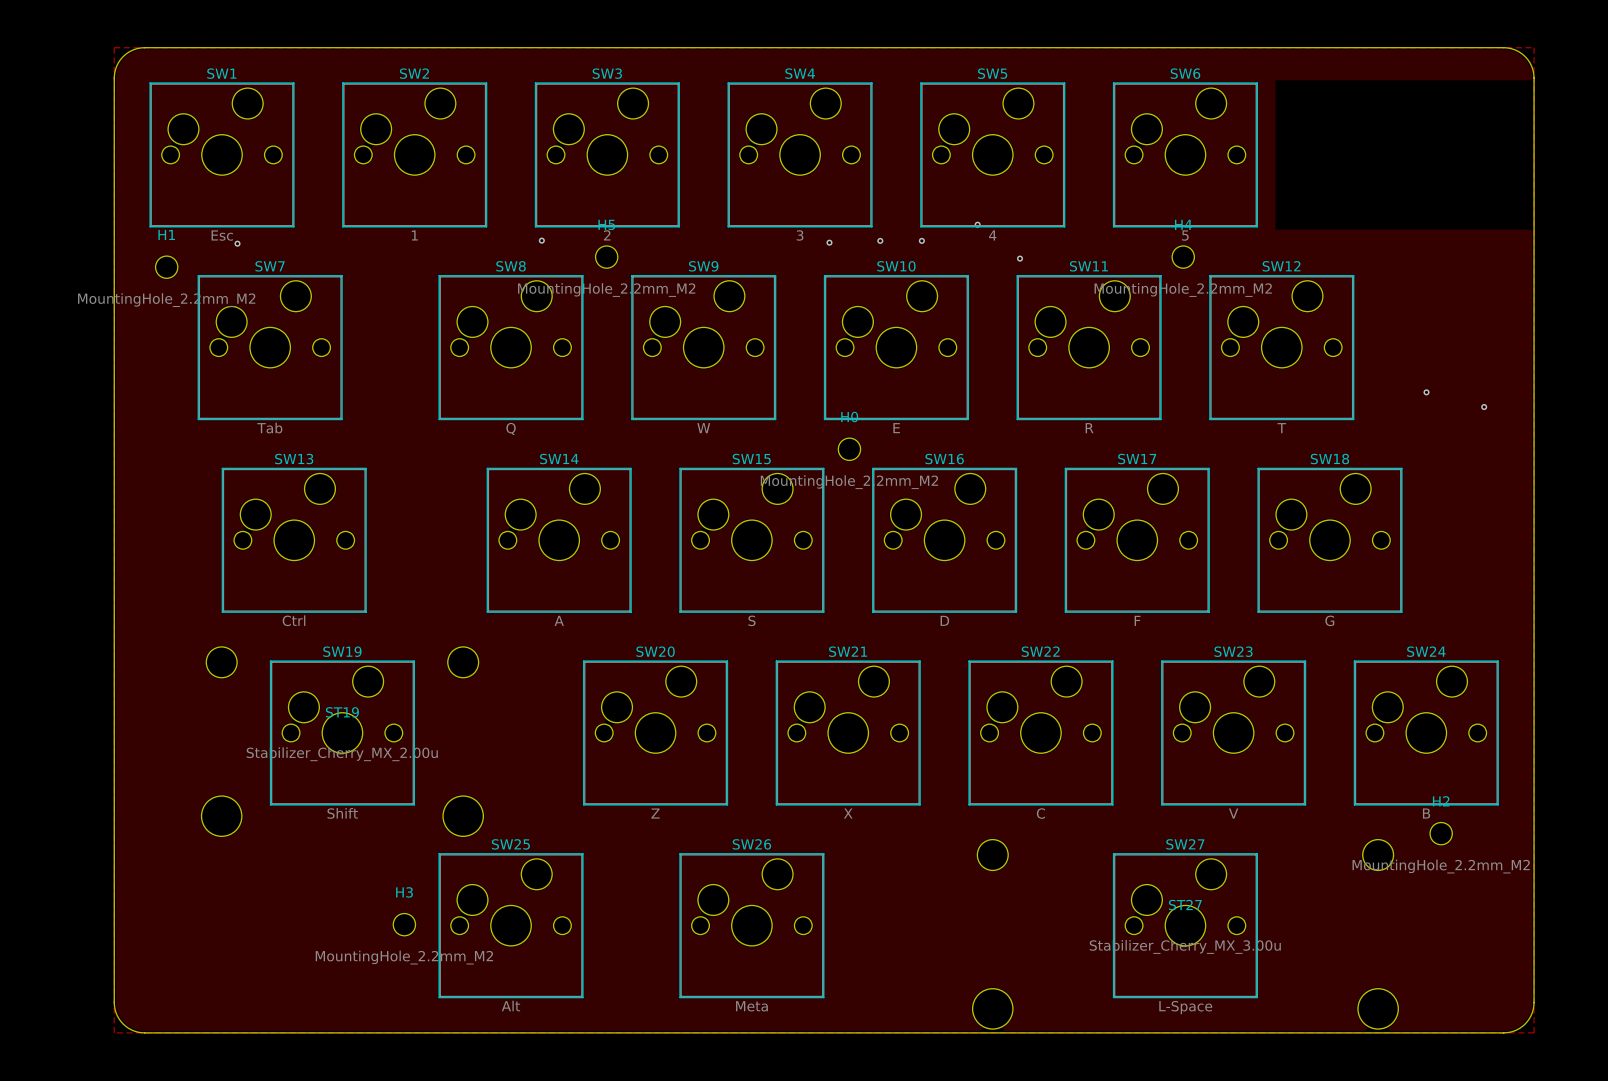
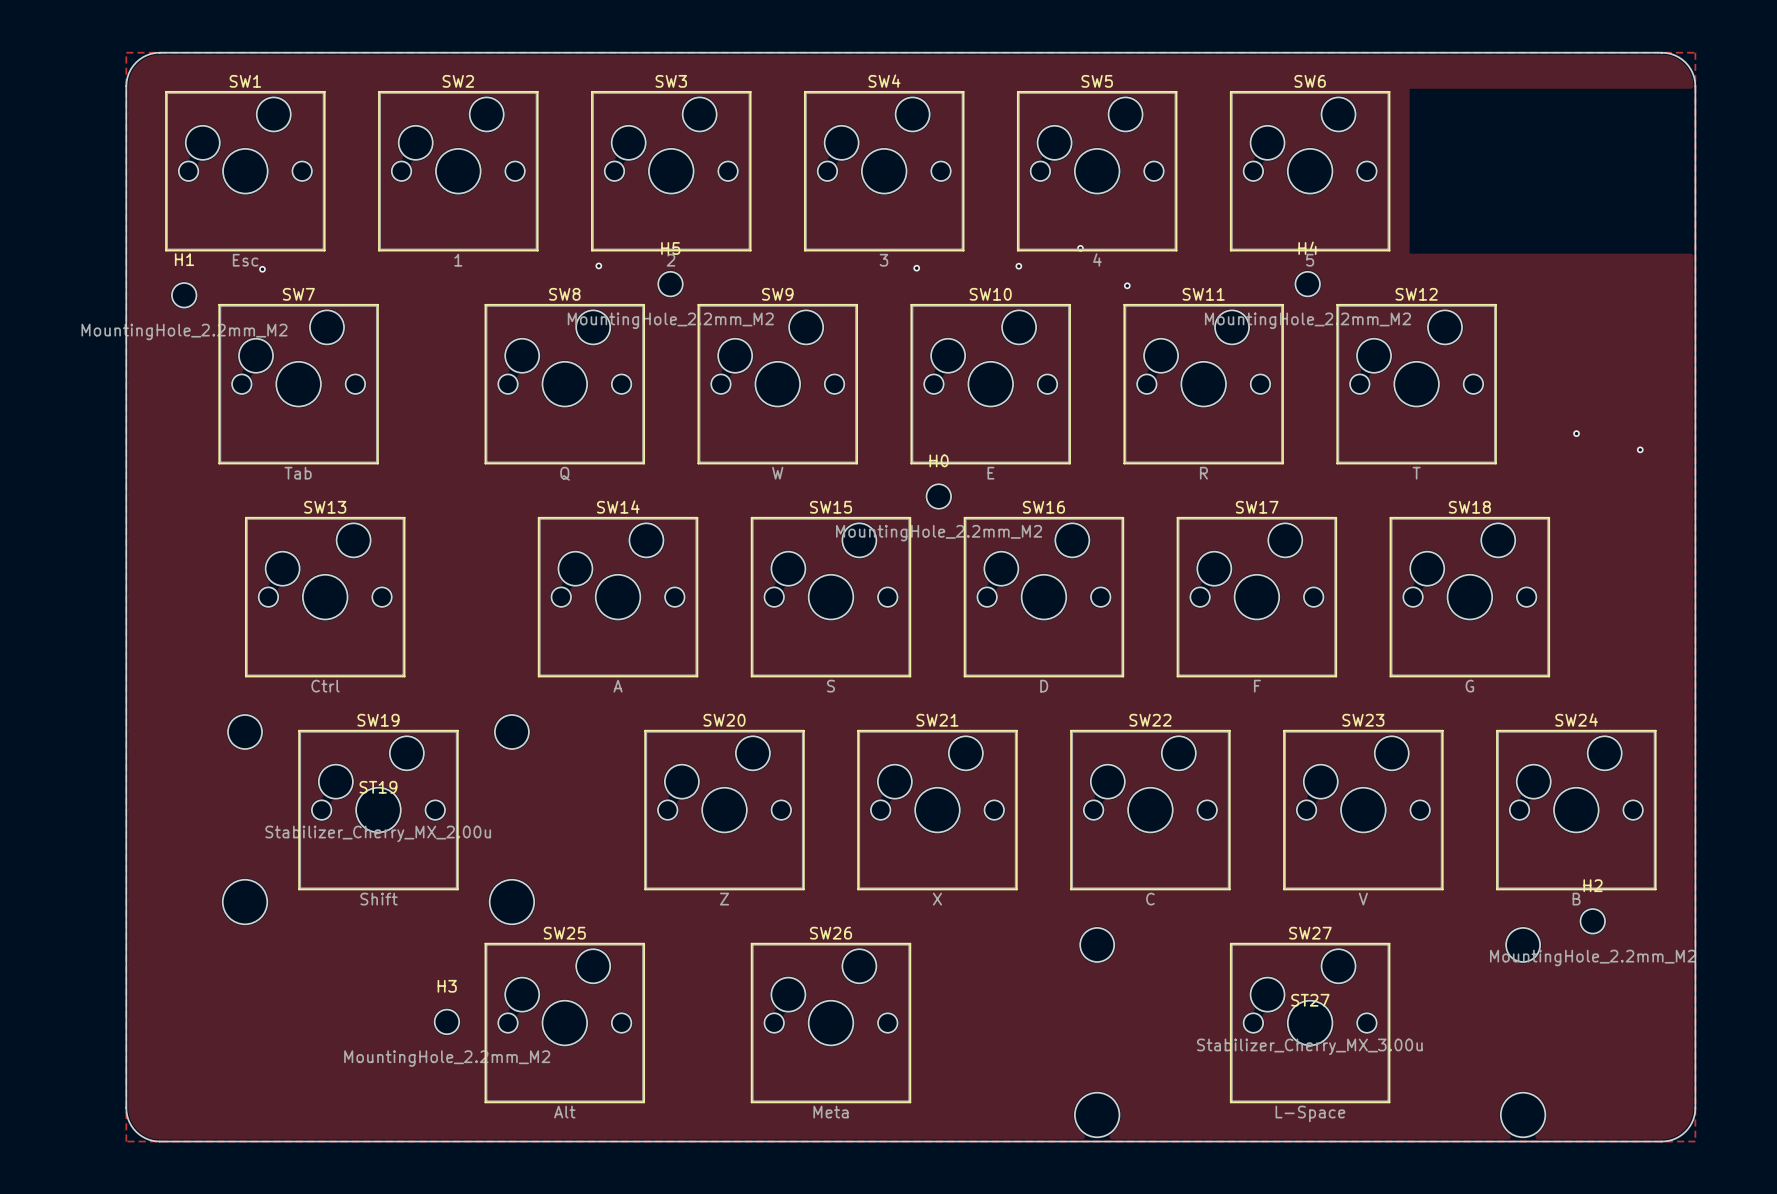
via: (880, 240) -> none

